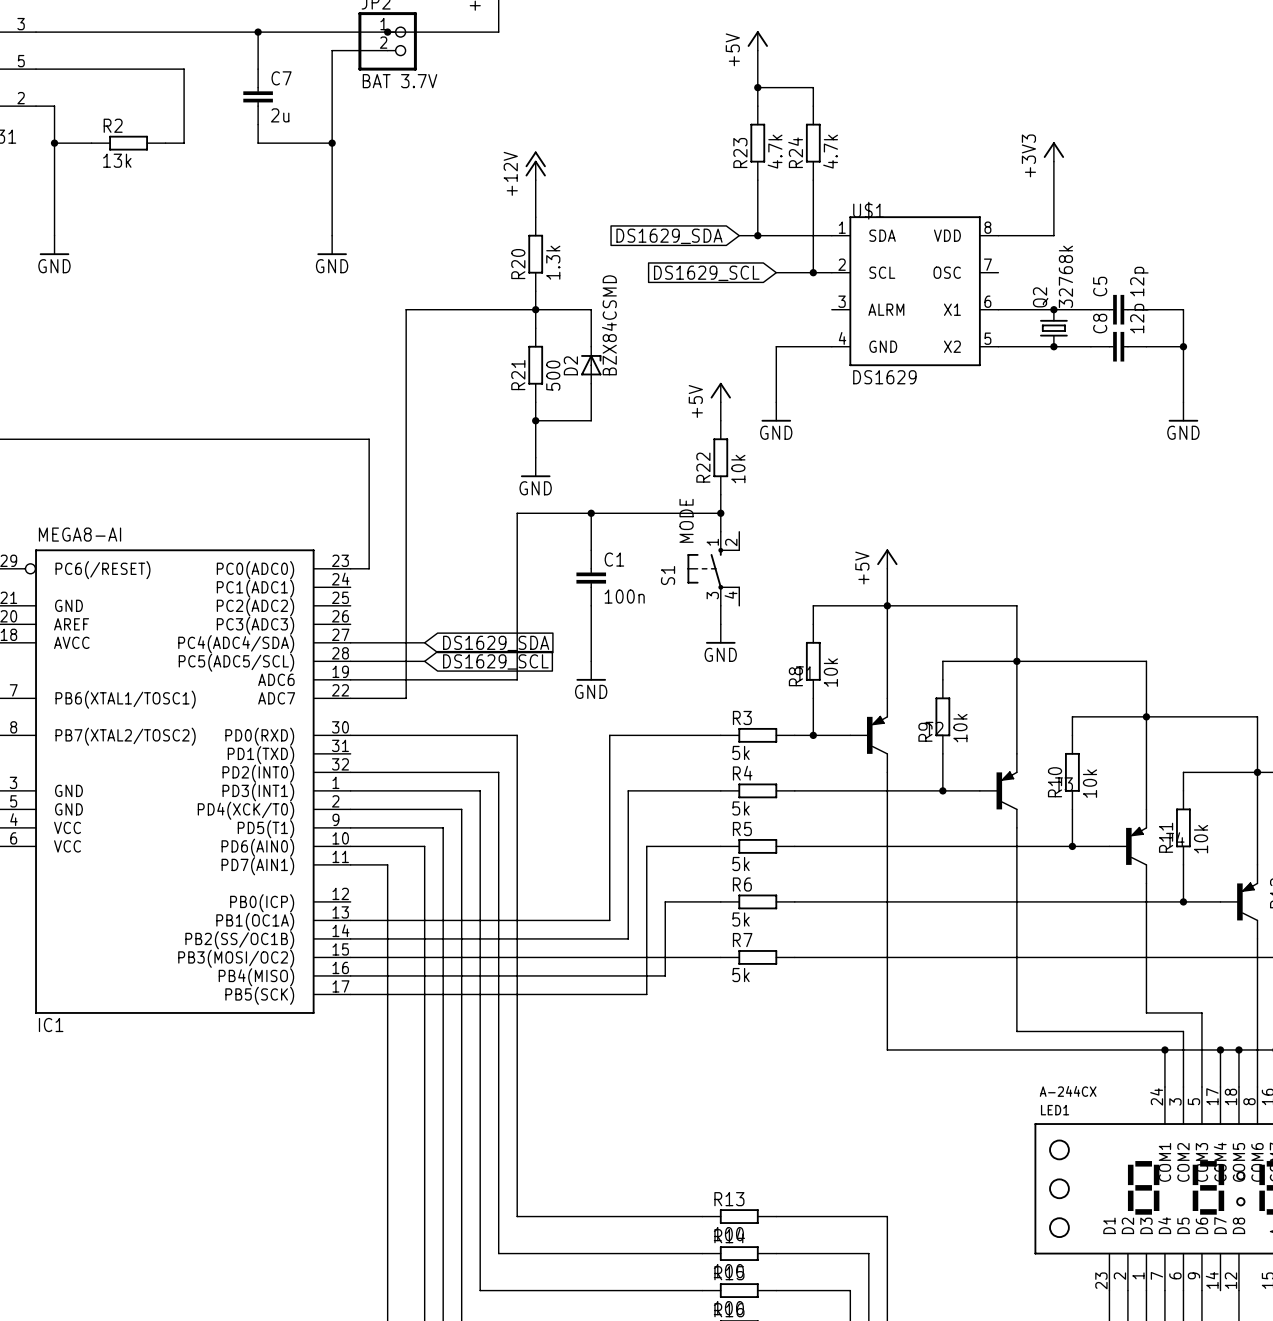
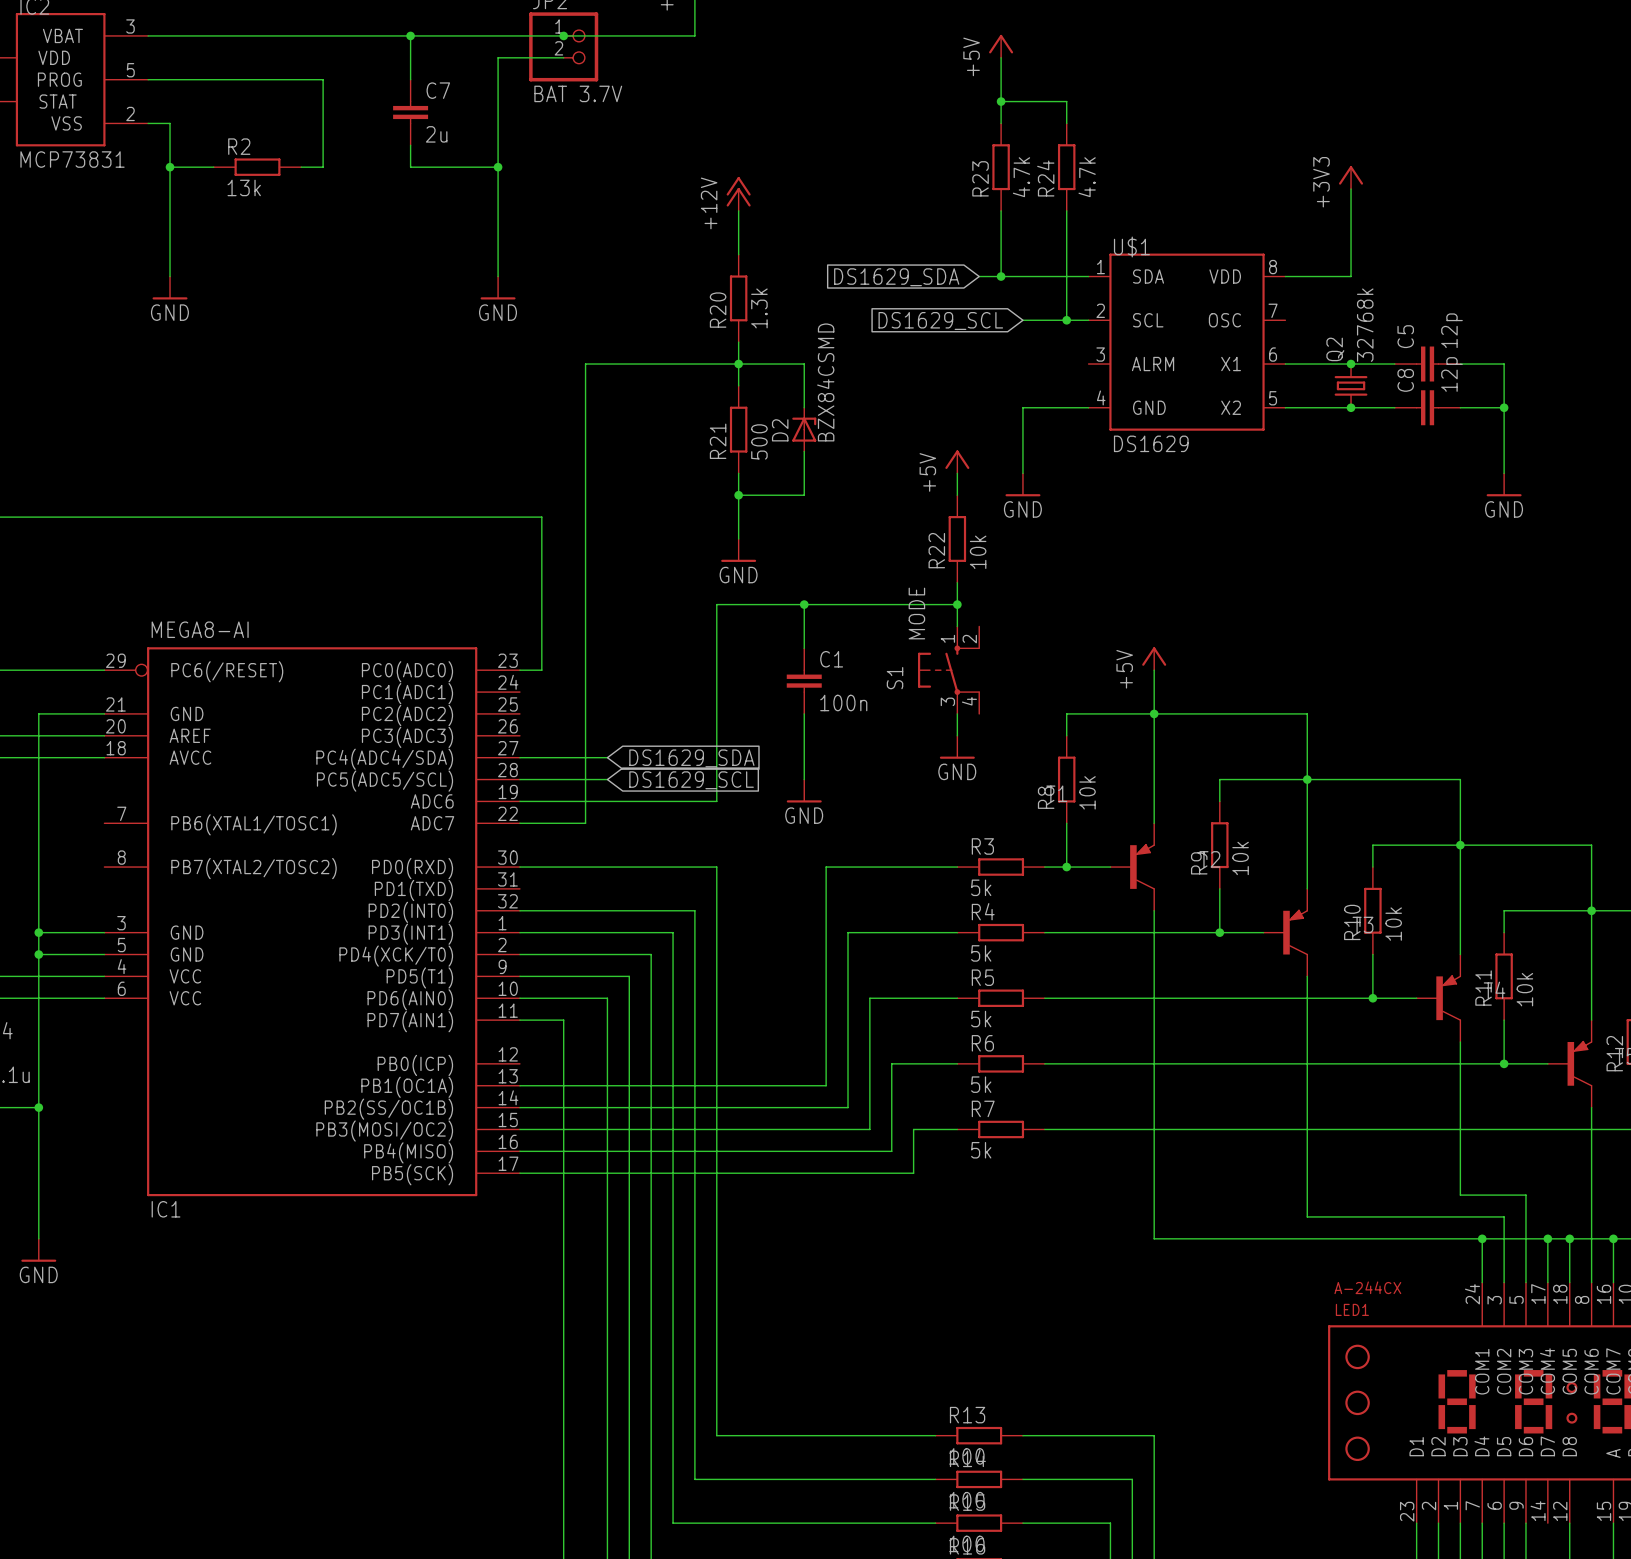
wire: (683, 957) (646, 957) (646, 994) -> (913, 1129) (913, 1173) (869, 1173)

